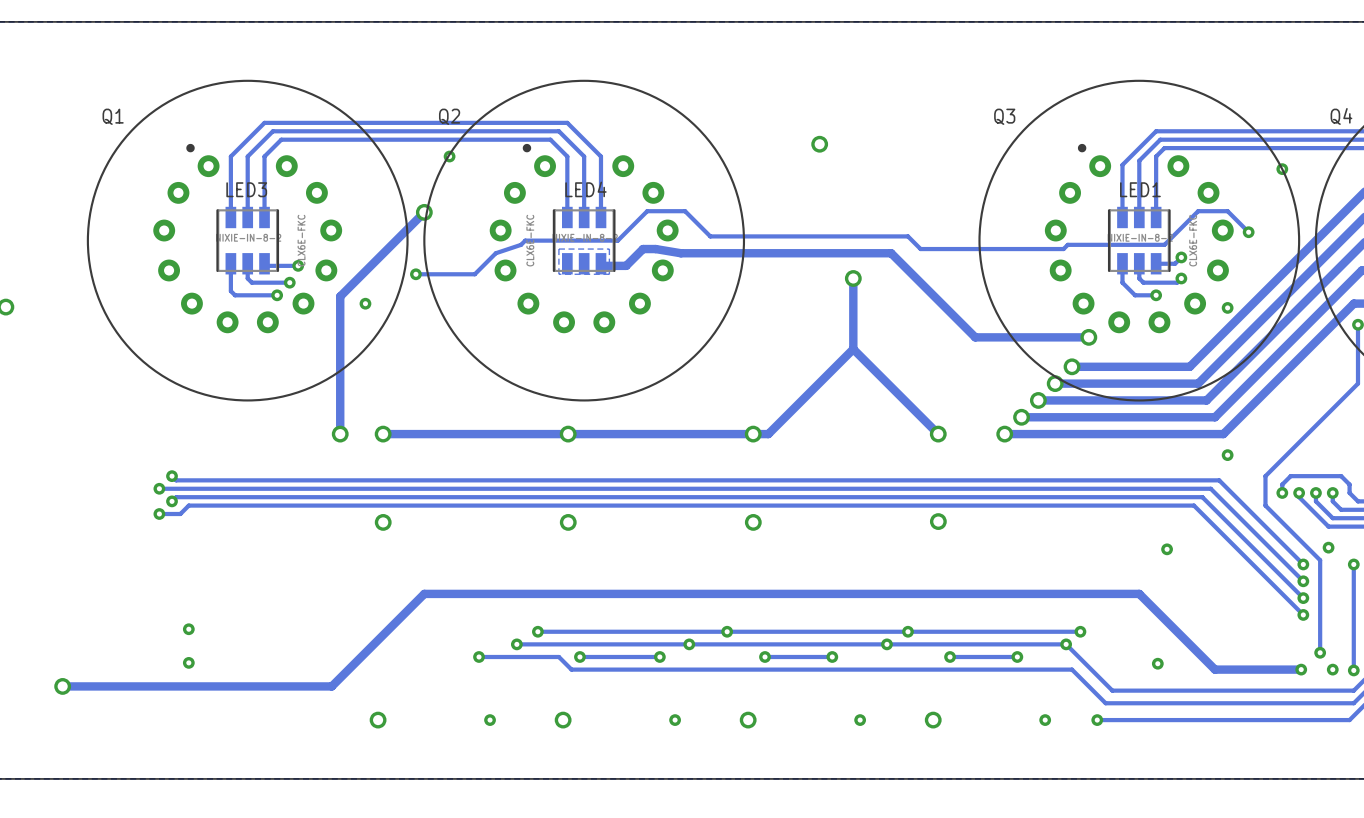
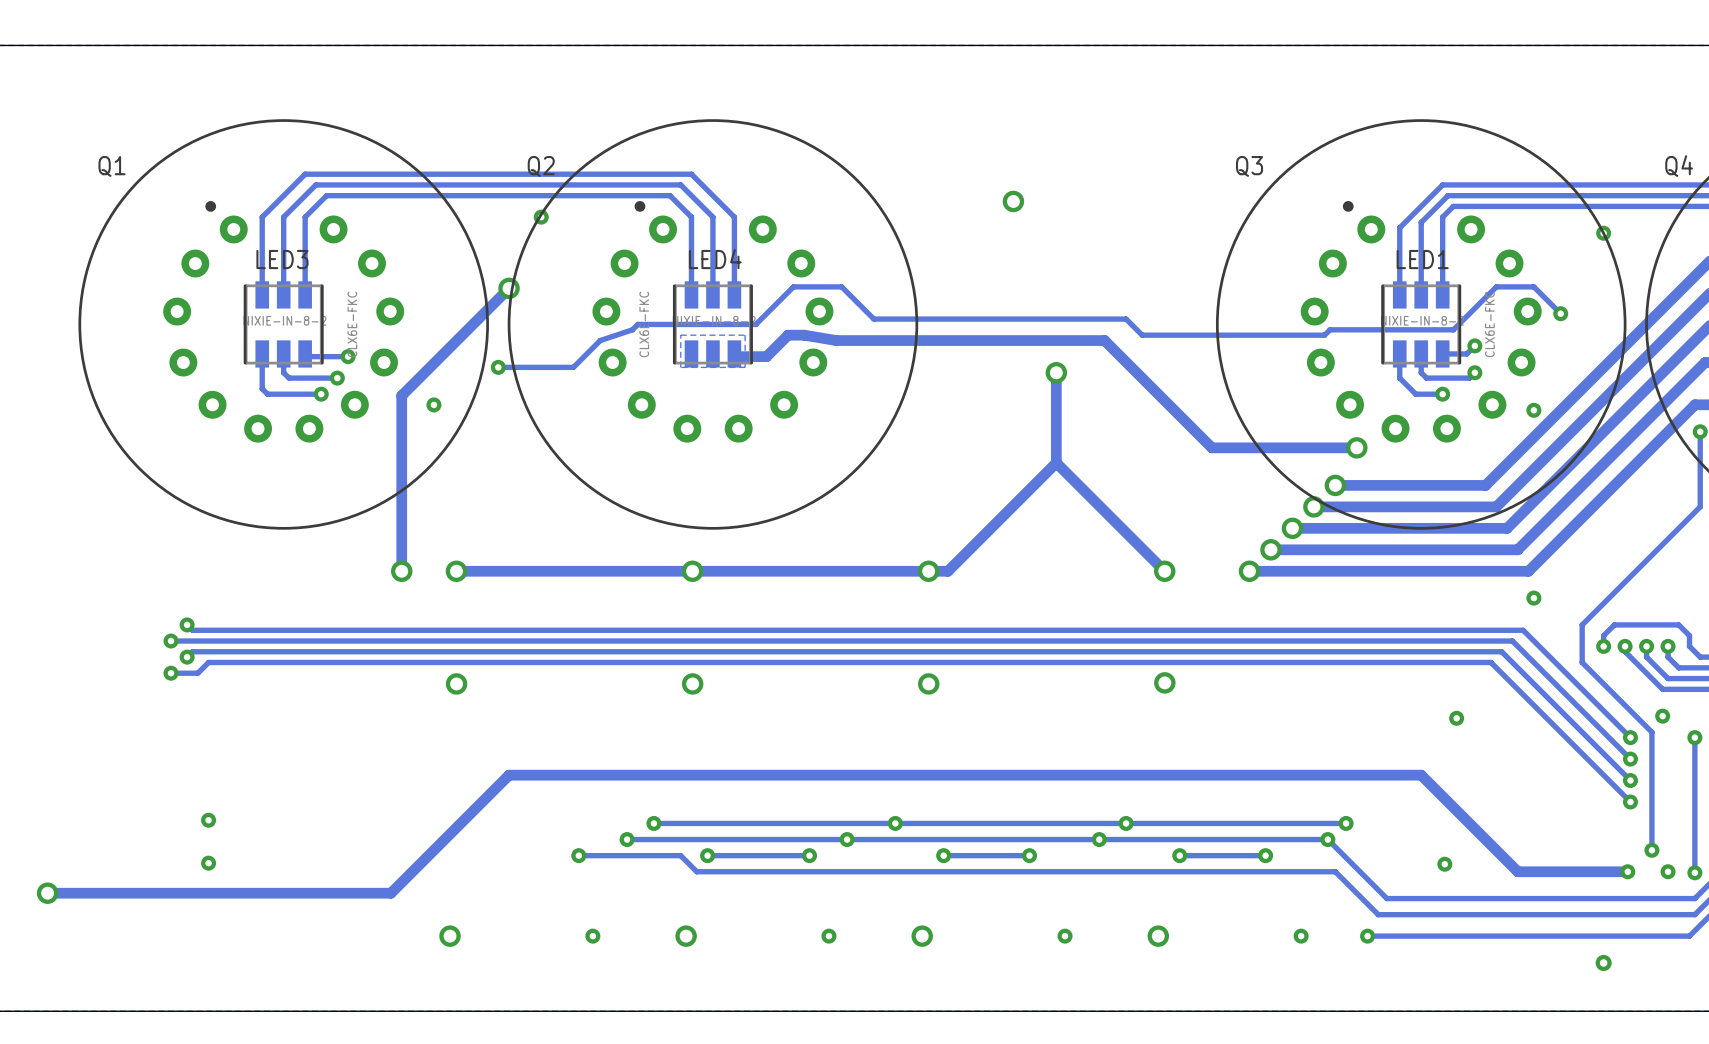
via: none -> (1603, 962)

